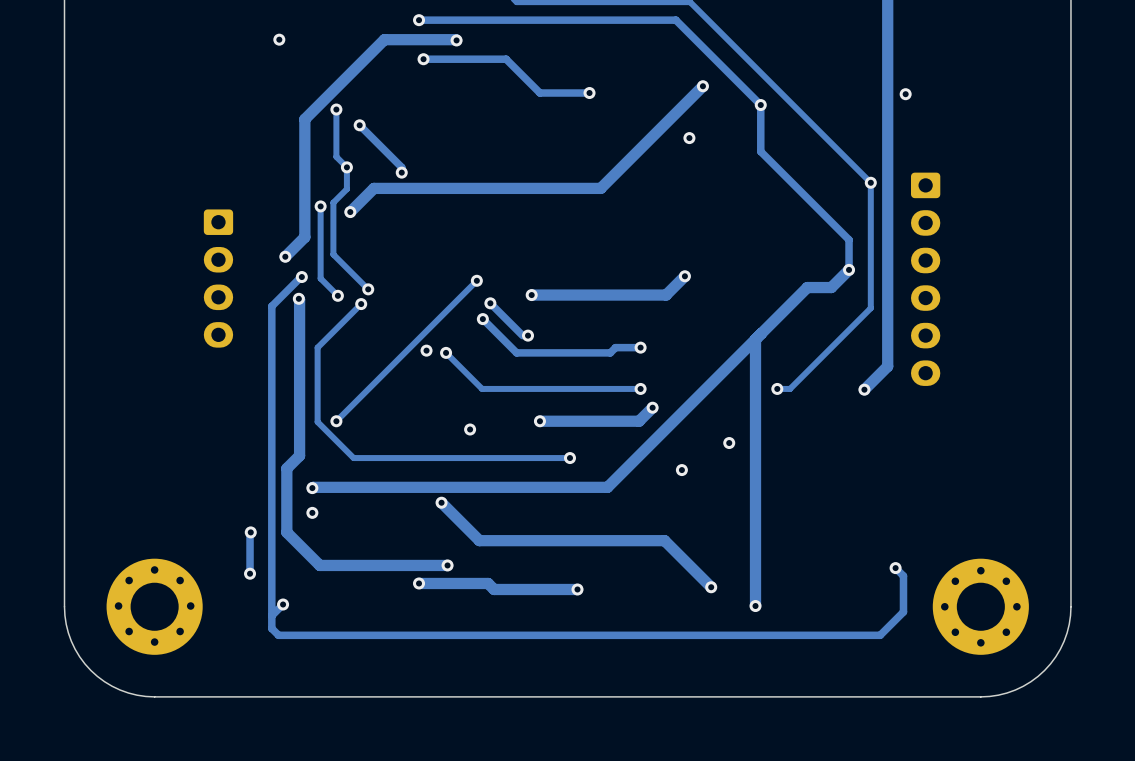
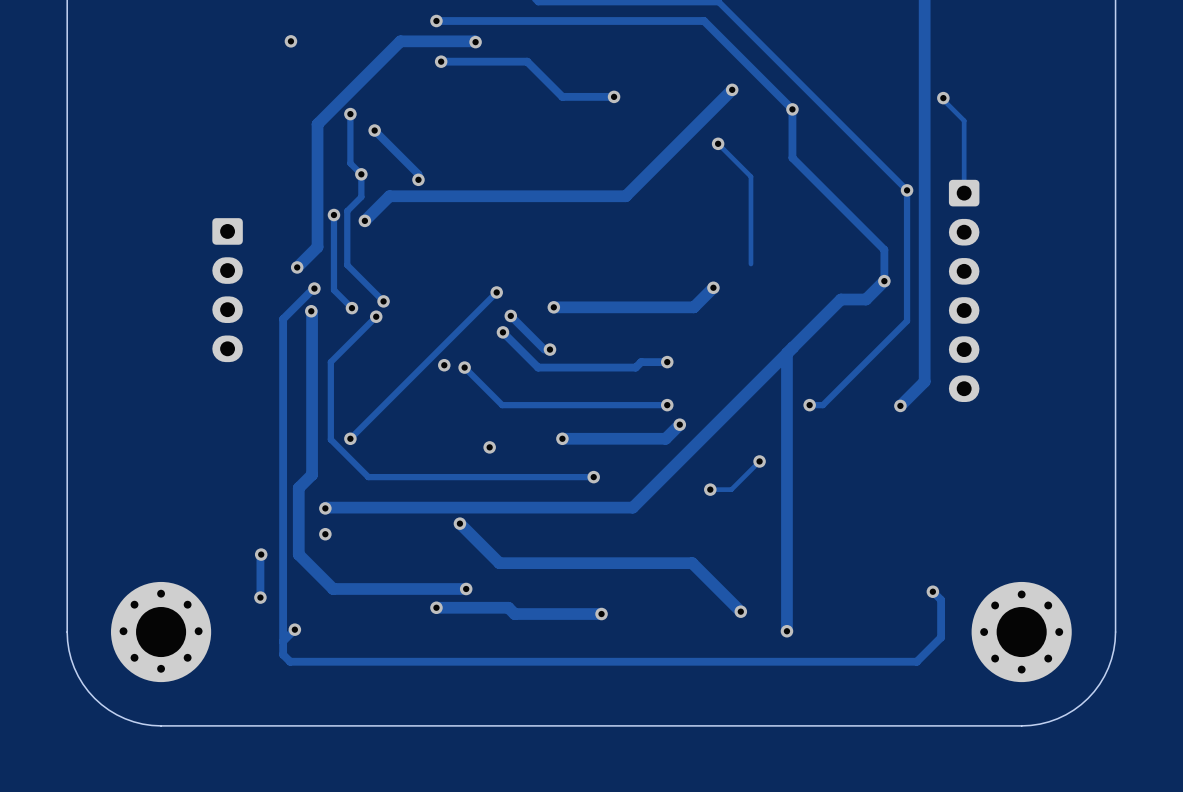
track: none -> (939, 96) (964, 120) (964, 193)
track: none -> (718, 143) (750, 176) (750, 263)
track: none -> (759, 461) (731, 489) (710, 489)

